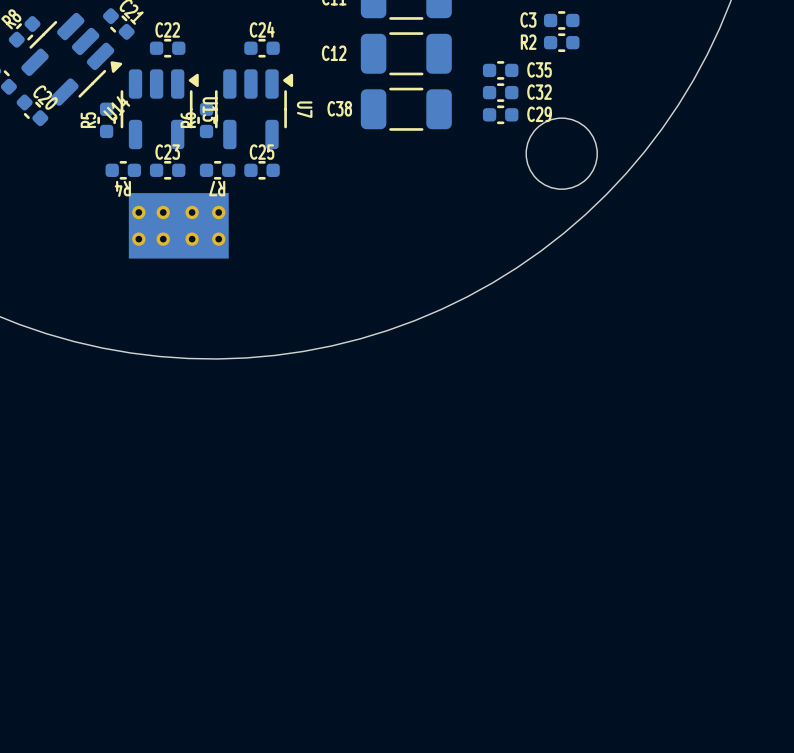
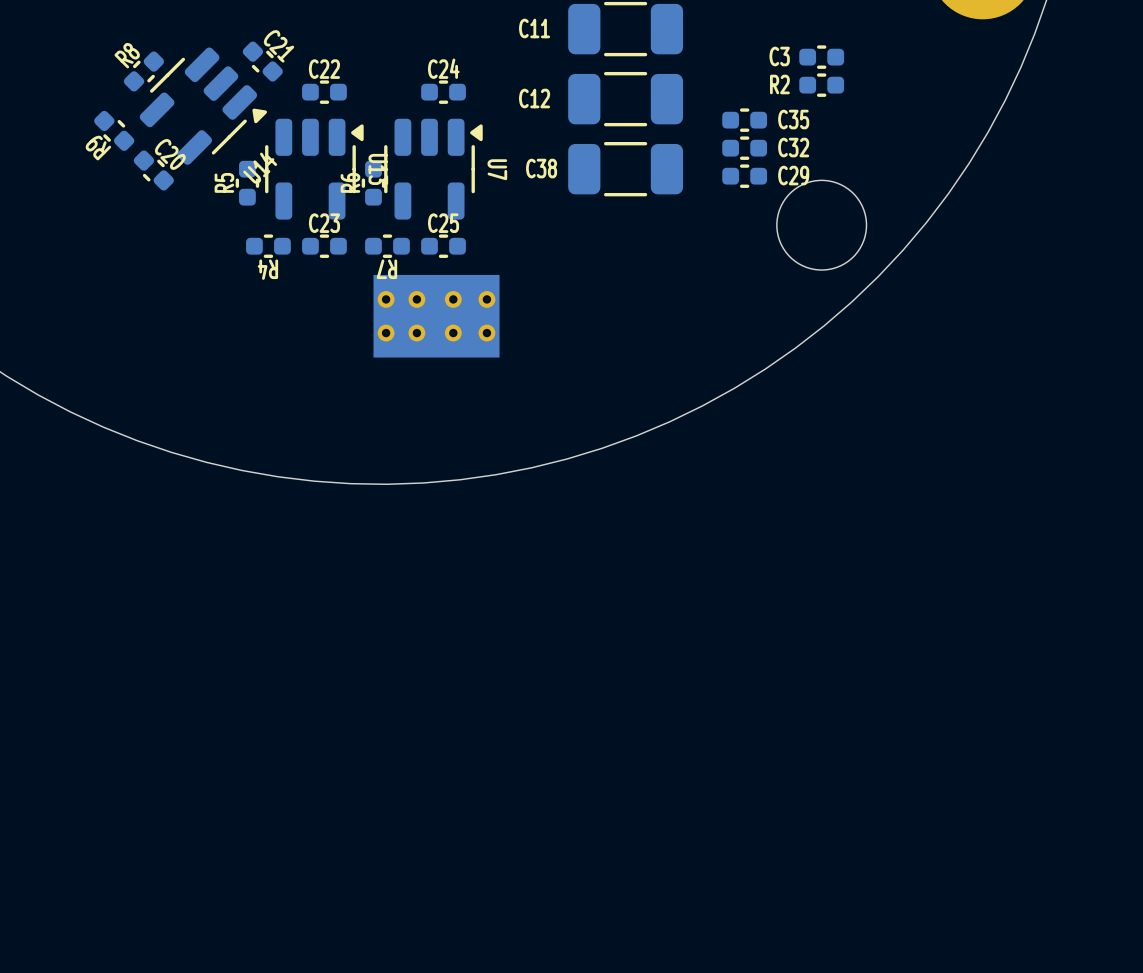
part position: (178, 225) -> (436, 316)

